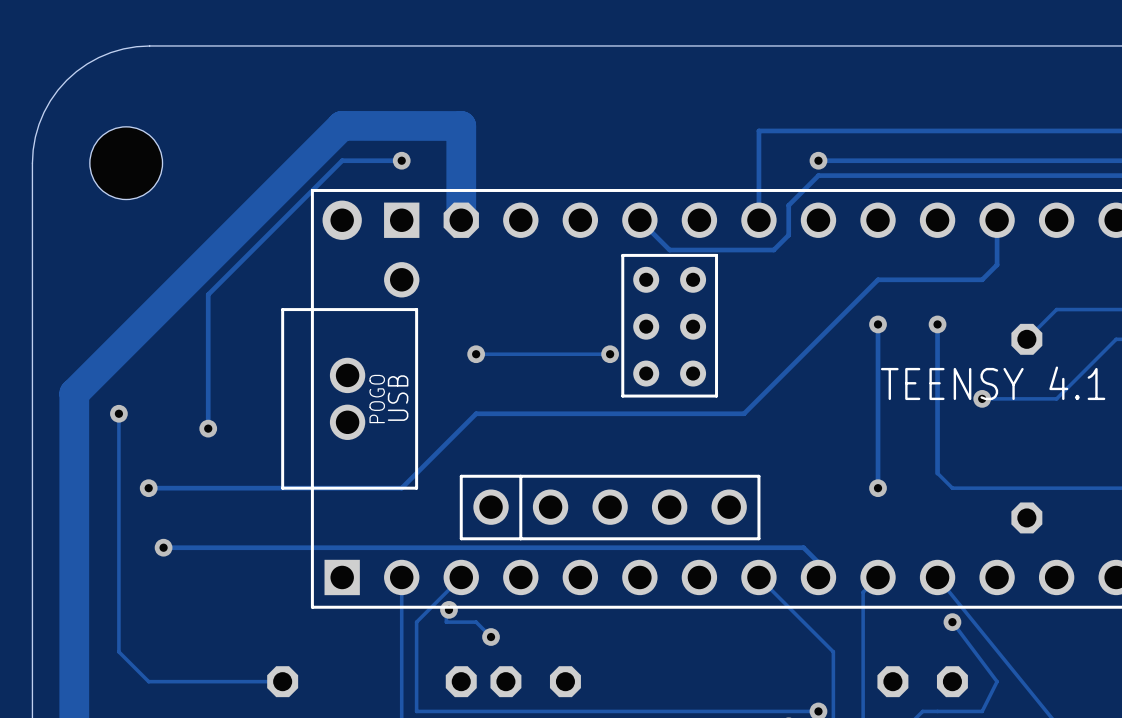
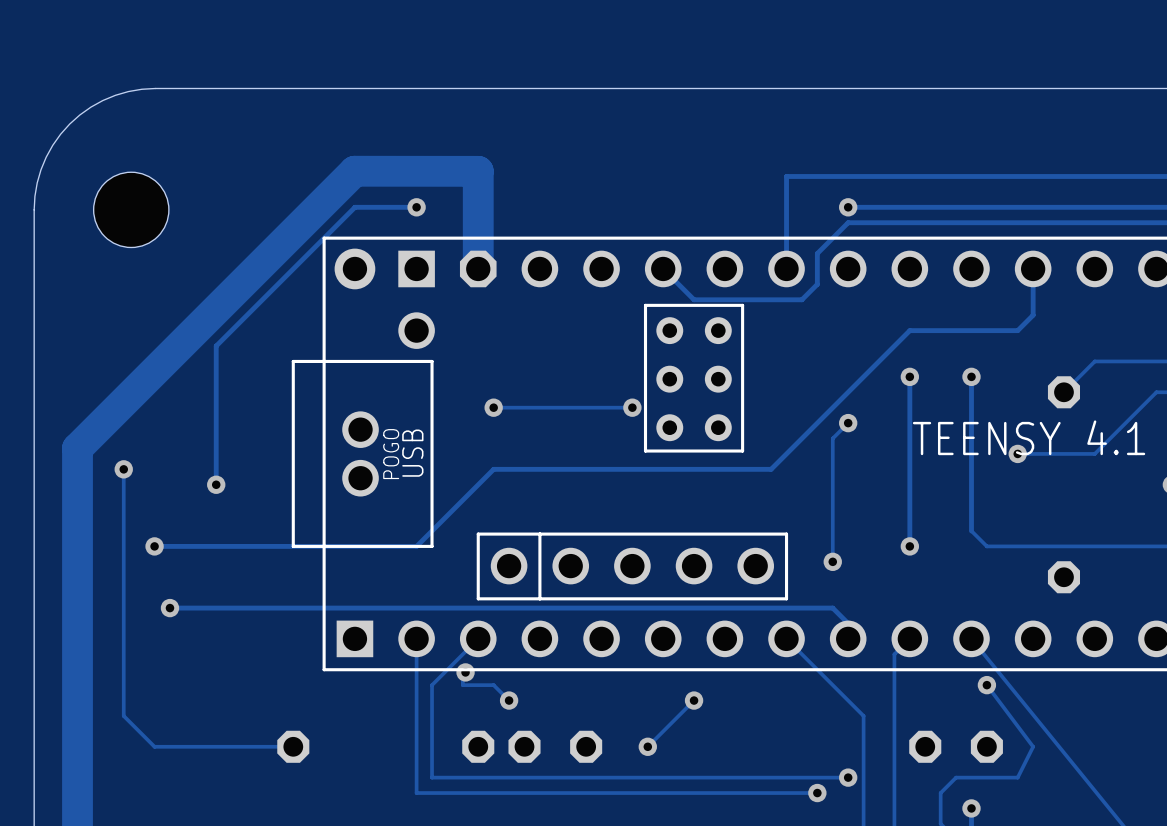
track: none -> (848, 423) (832, 438) (832, 561)
via: none -> (848, 423)
via: none -> (832, 561)
track: none -> (694, 700) (647, 746)
via: none -> (694, 700)
via: none -> (647, 746)

